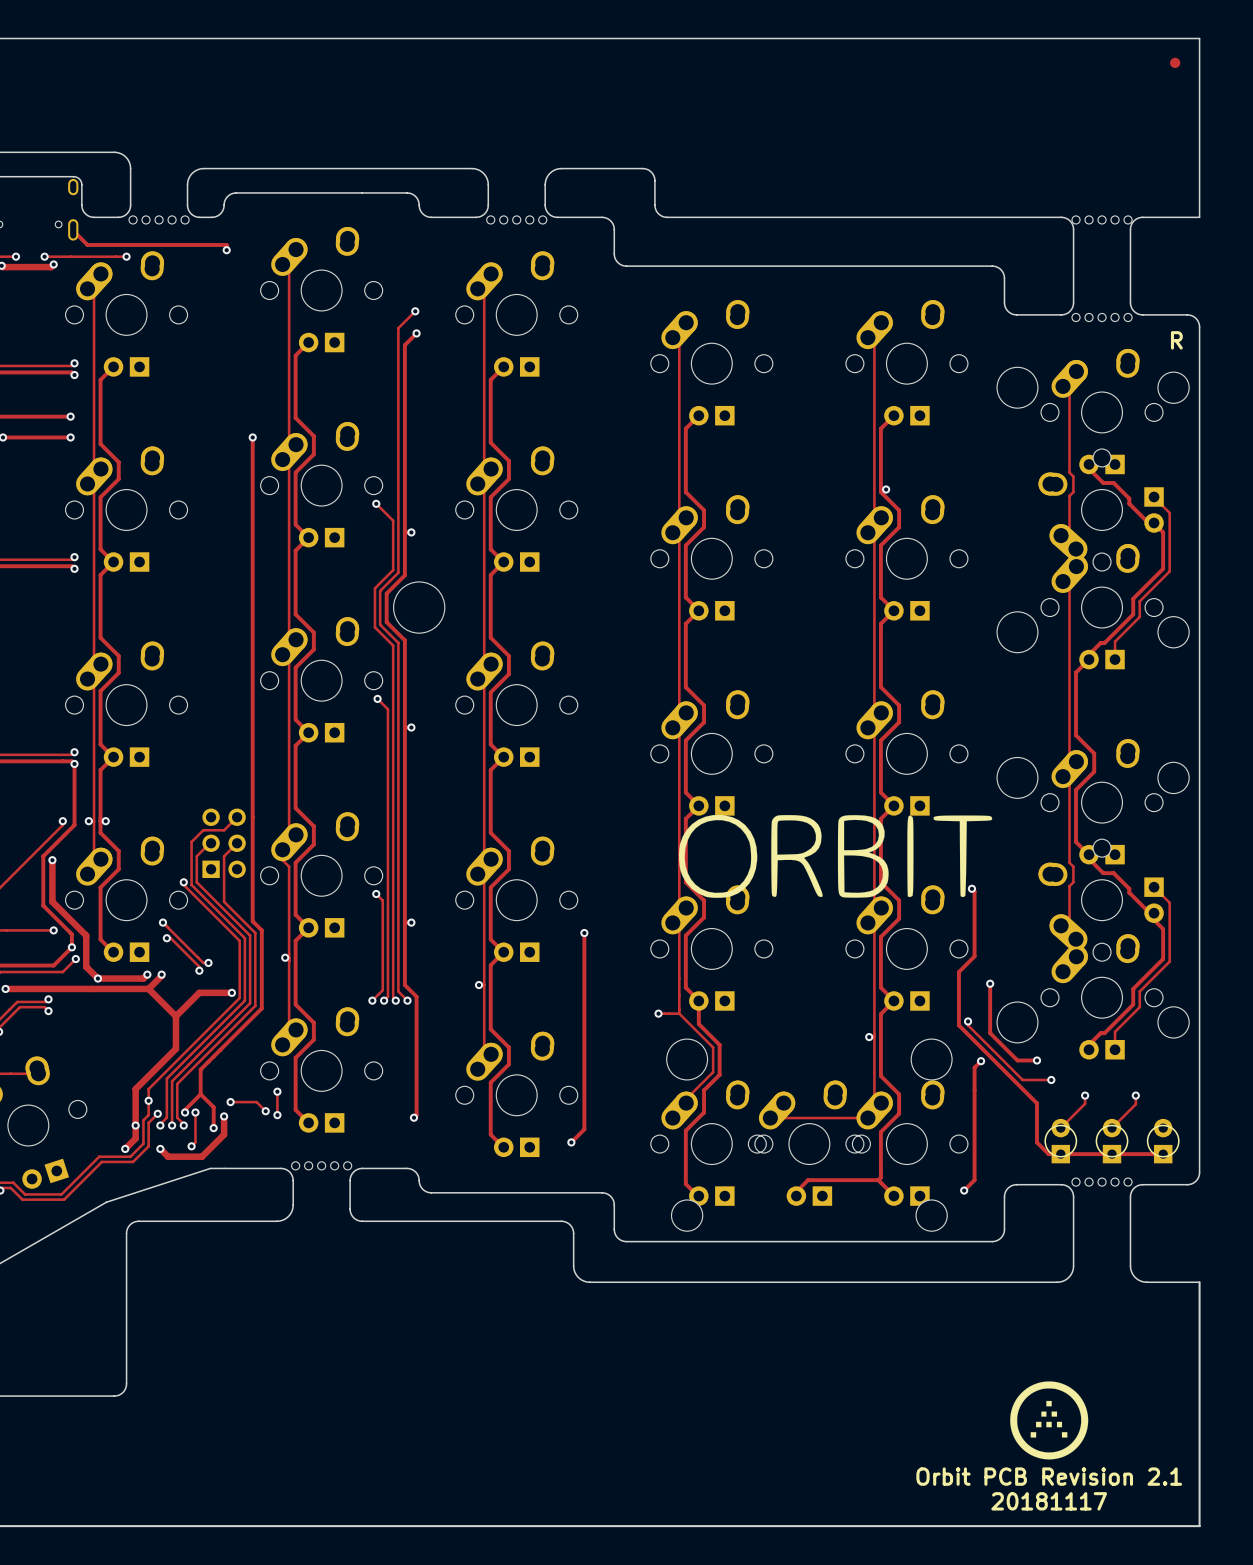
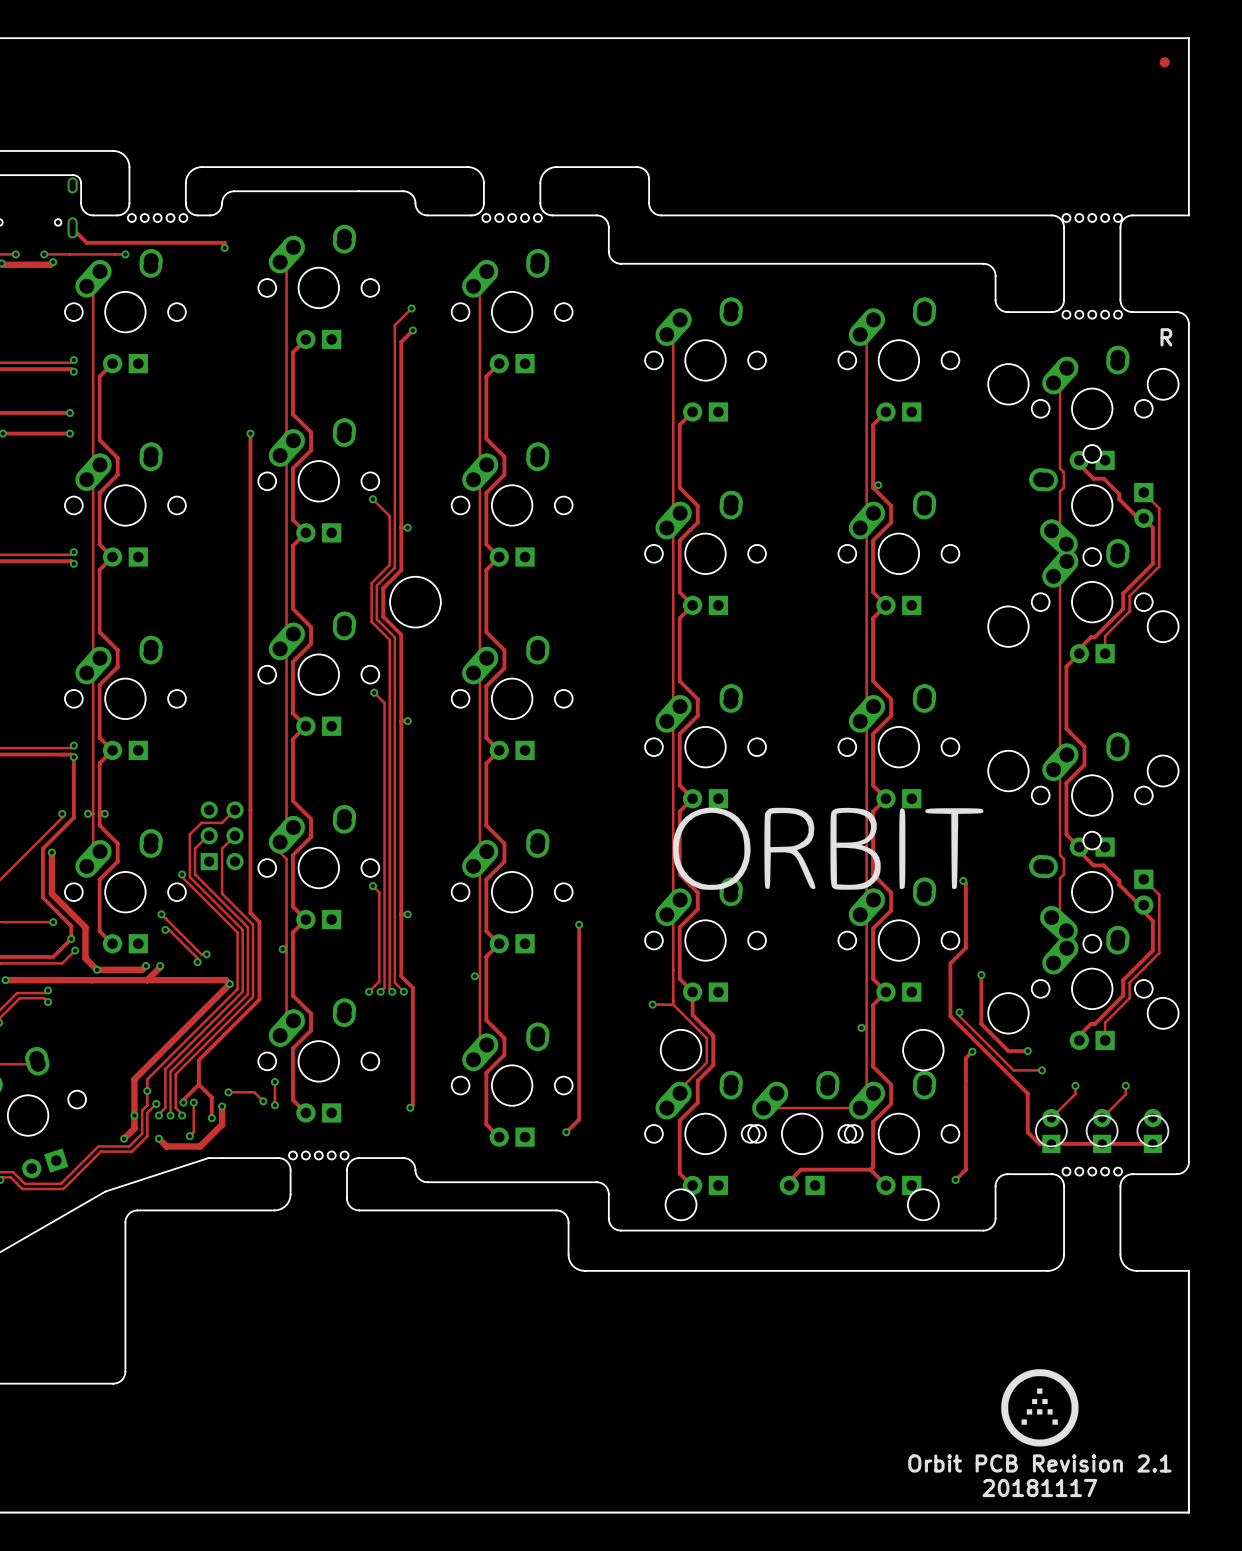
track: (148, 988) (175, 1016) -> (147, 980) (225, 980) (229, 984) (174, 1039)
track: (231, 992) (199, 992) (175, 1016) -> none
track: (175, 1016) (175, 1048) -> none

